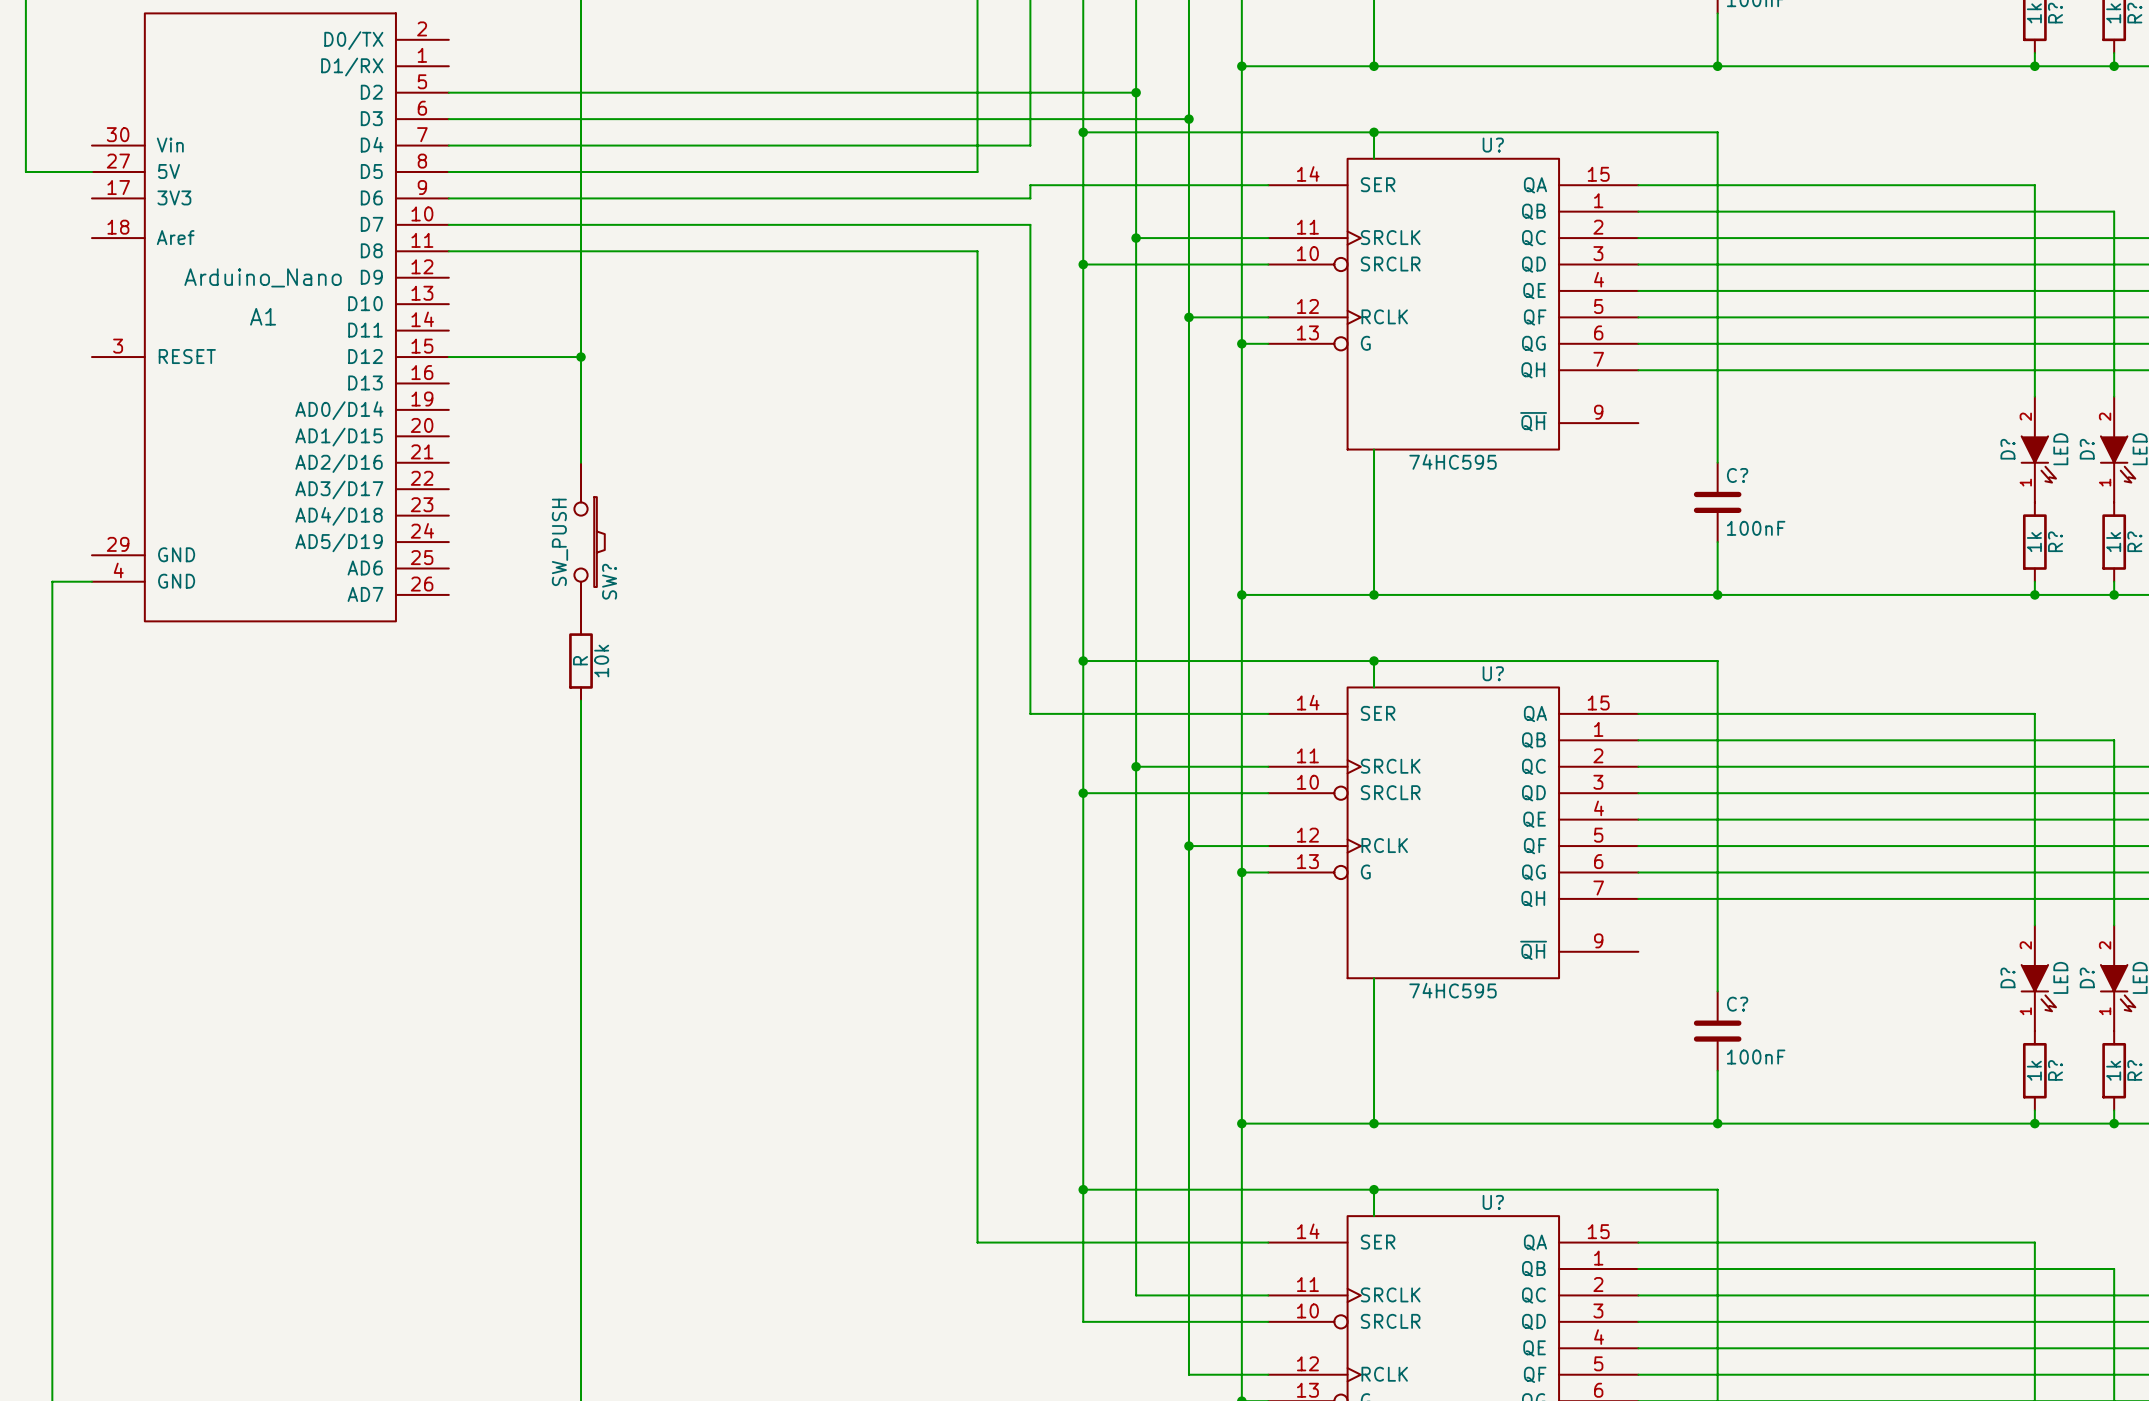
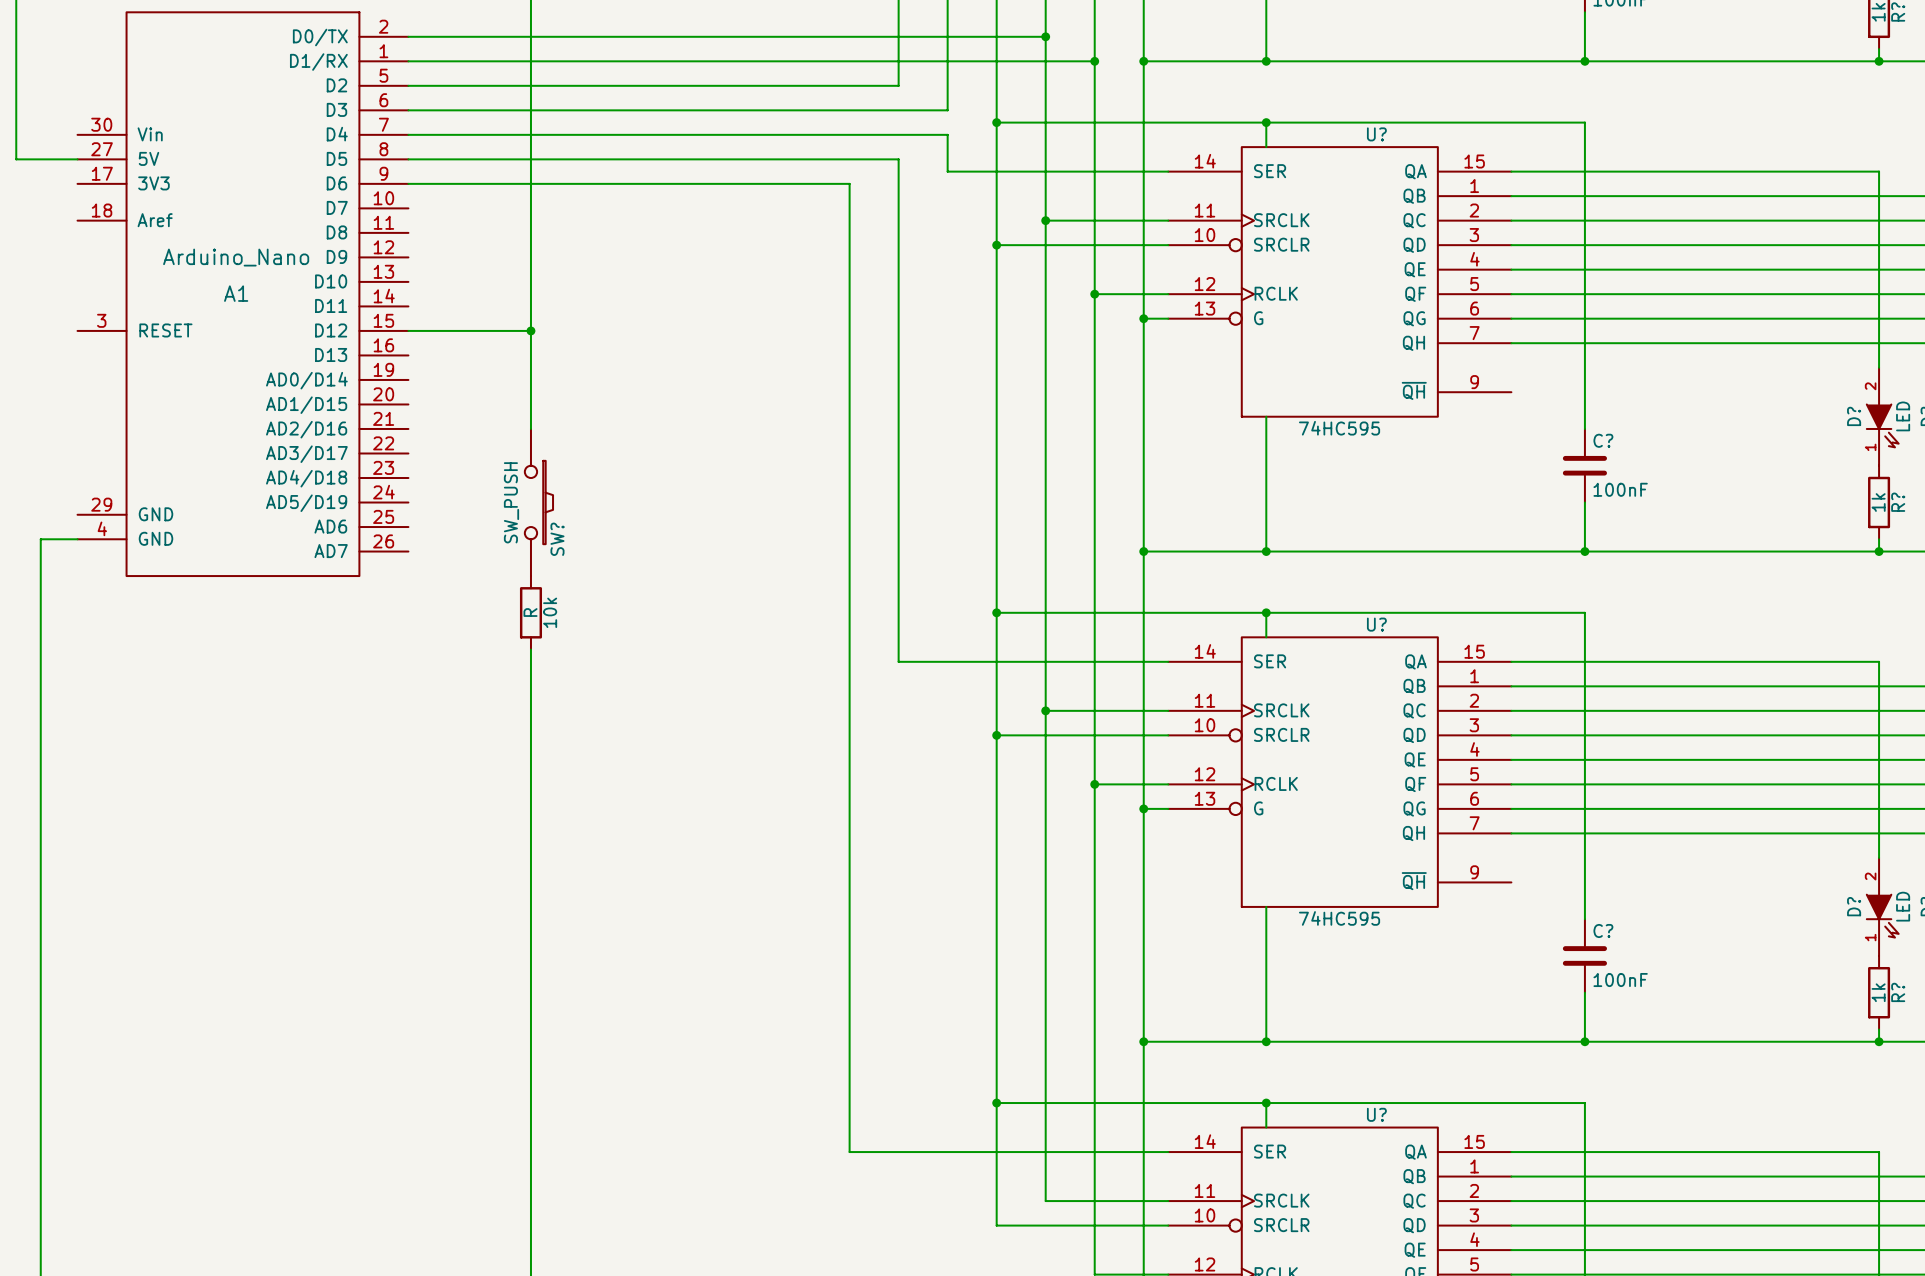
wire: none -> (408, 36) (1045, 36)
junction: none -> (1045, 36)
wire: none -> (408, 61) (1094, 61)
junction: none -> (1094, 61)
wire: (1136, 92) (977, 92) (977, 171) -> (898, 232) (898, 159)
junction: (1136, 92) -> none
wire: (1188, 119) (1030, 119) (1030, 145) -> none
junction: (1188, 119) -> none
wire: (1030, 185) (1030, 198) (924, 198) -> (947, 171) (947, 134)
wire: (448, 224) (1030, 224) (1030, 713) -> (898, 661) (947, 661)
wire: (448, 251) (977, 251) -> none
wire: (977, 713) (977, 1242) -> (849, 183) (849, 1152) (898, 1152)

